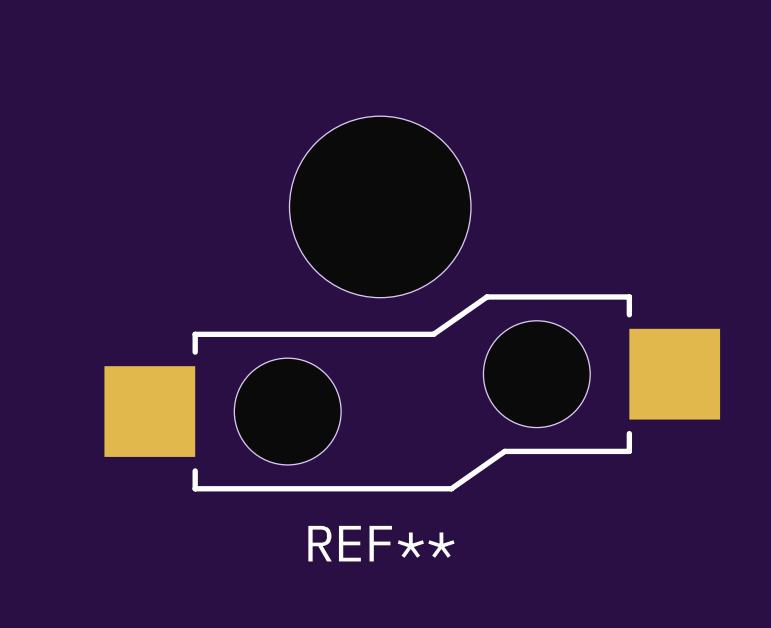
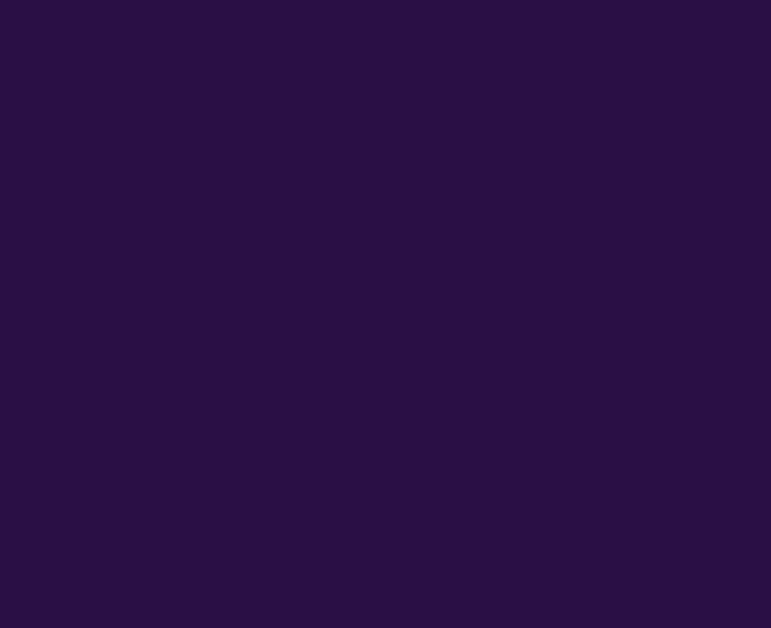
REF**: (412, 303) -> none

